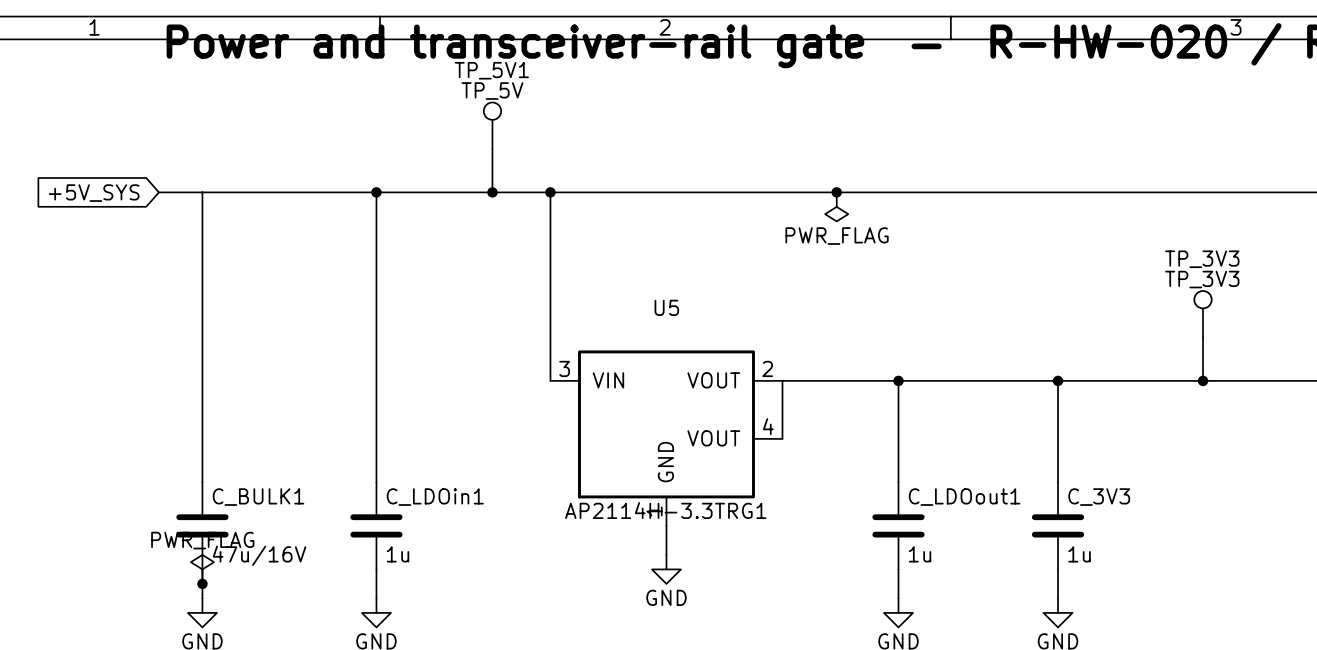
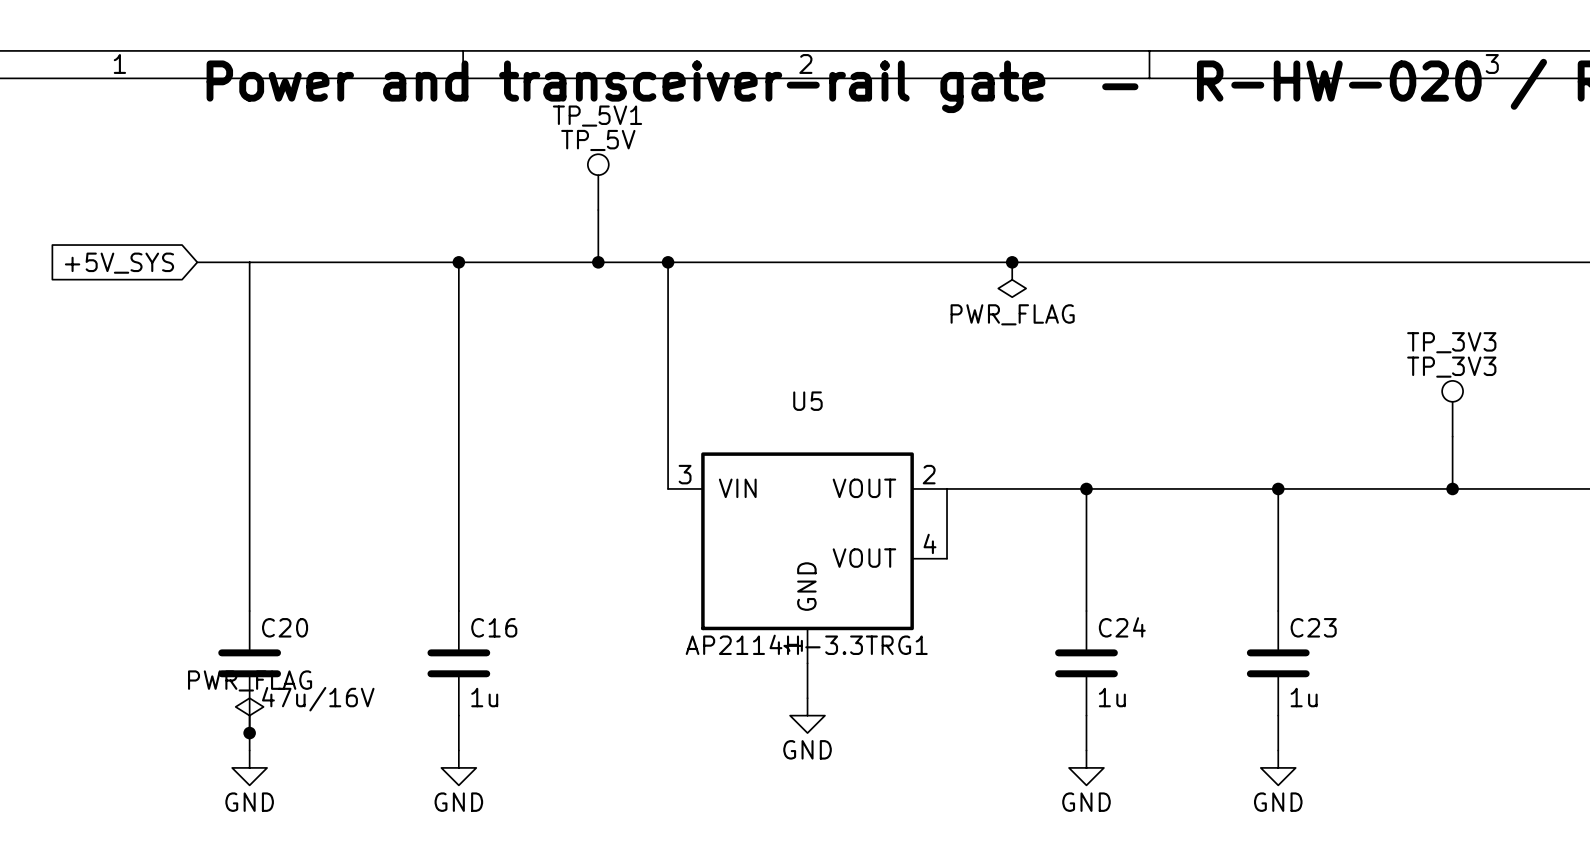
C_BULK1 name: C_BULK1 (258, 497) -> C20 (285, 627)
C_LDOin1 name: C_LDOin1 (435, 497) -> C16 (494, 627)
C_LDOout1 name: C_LDOout1 (964, 497) -> C24 (1122, 627)
C_3V3 name: C_3V3 (1099, 497) -> C23 (1313, 627)

